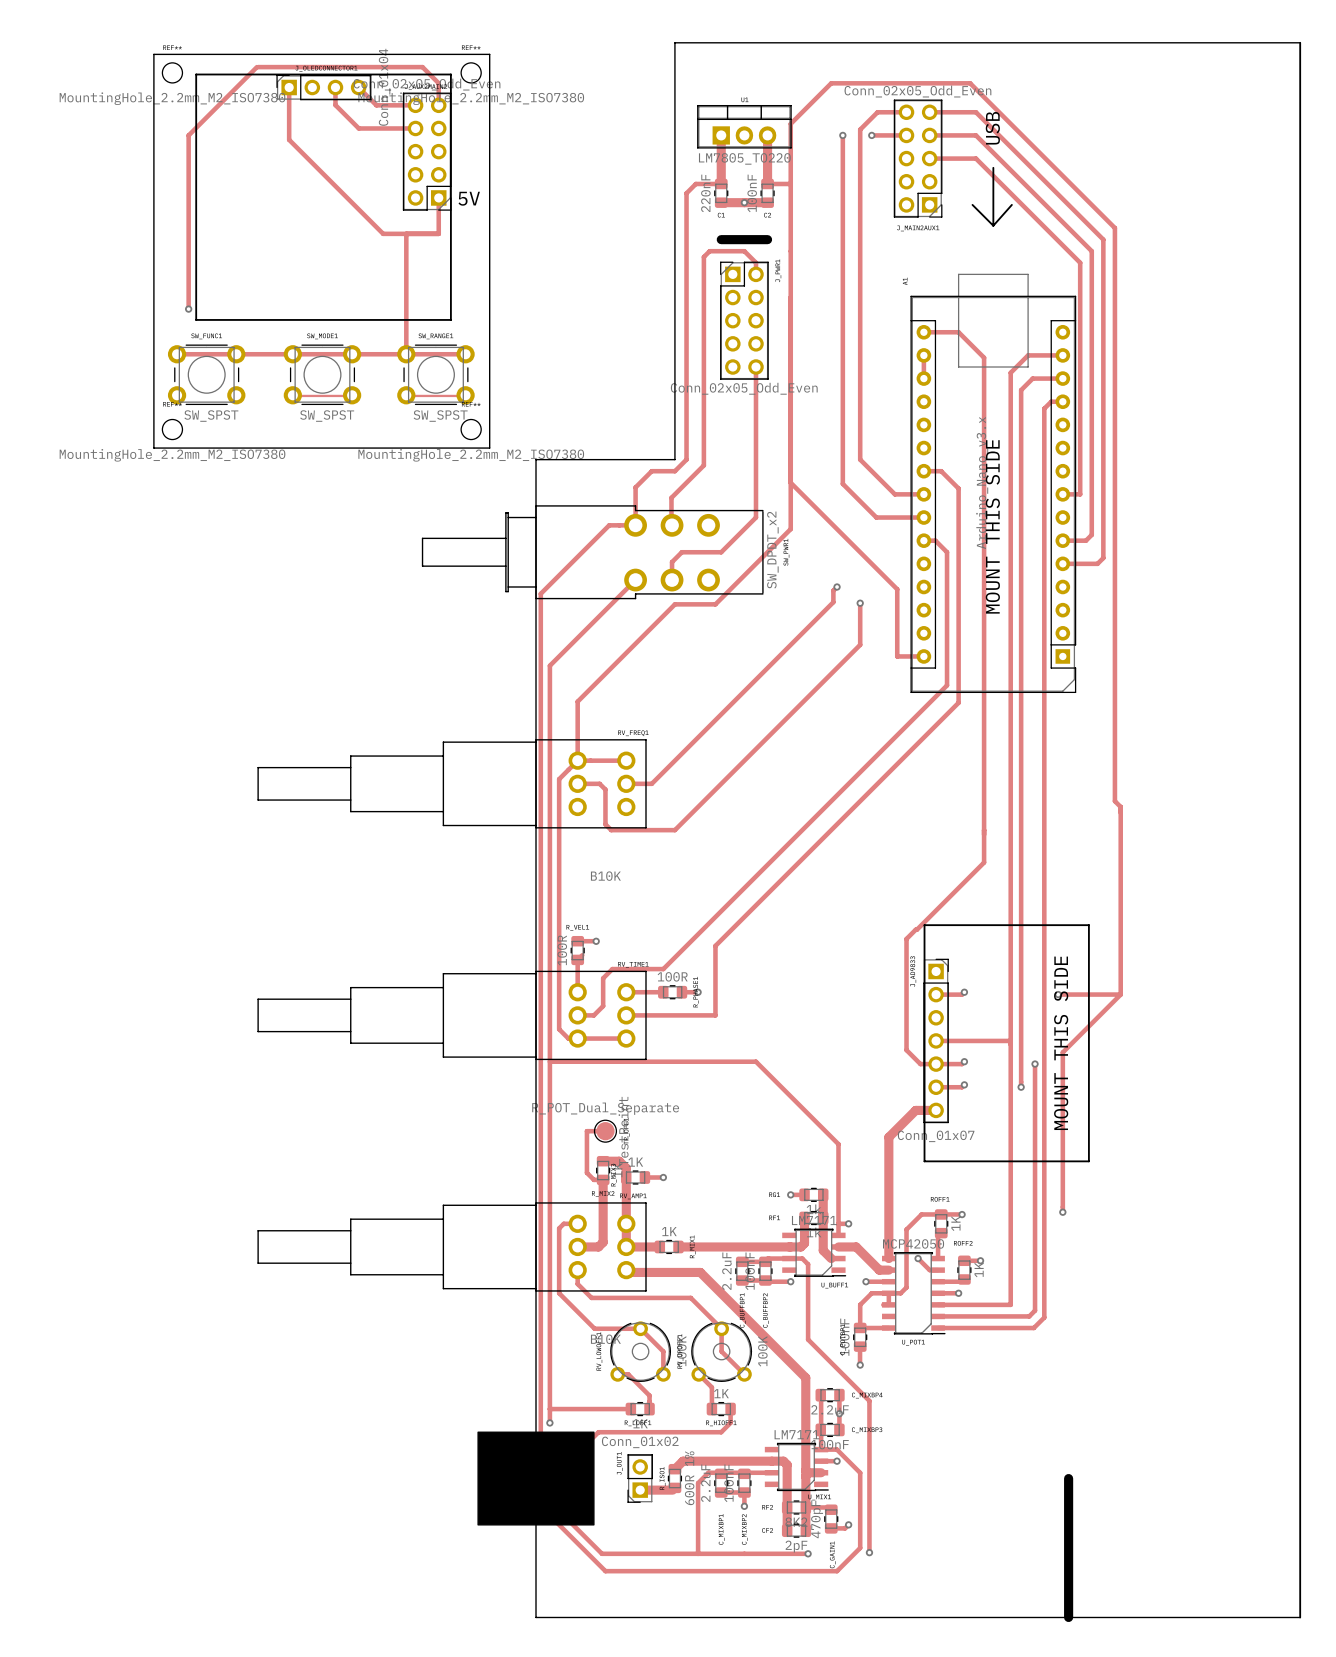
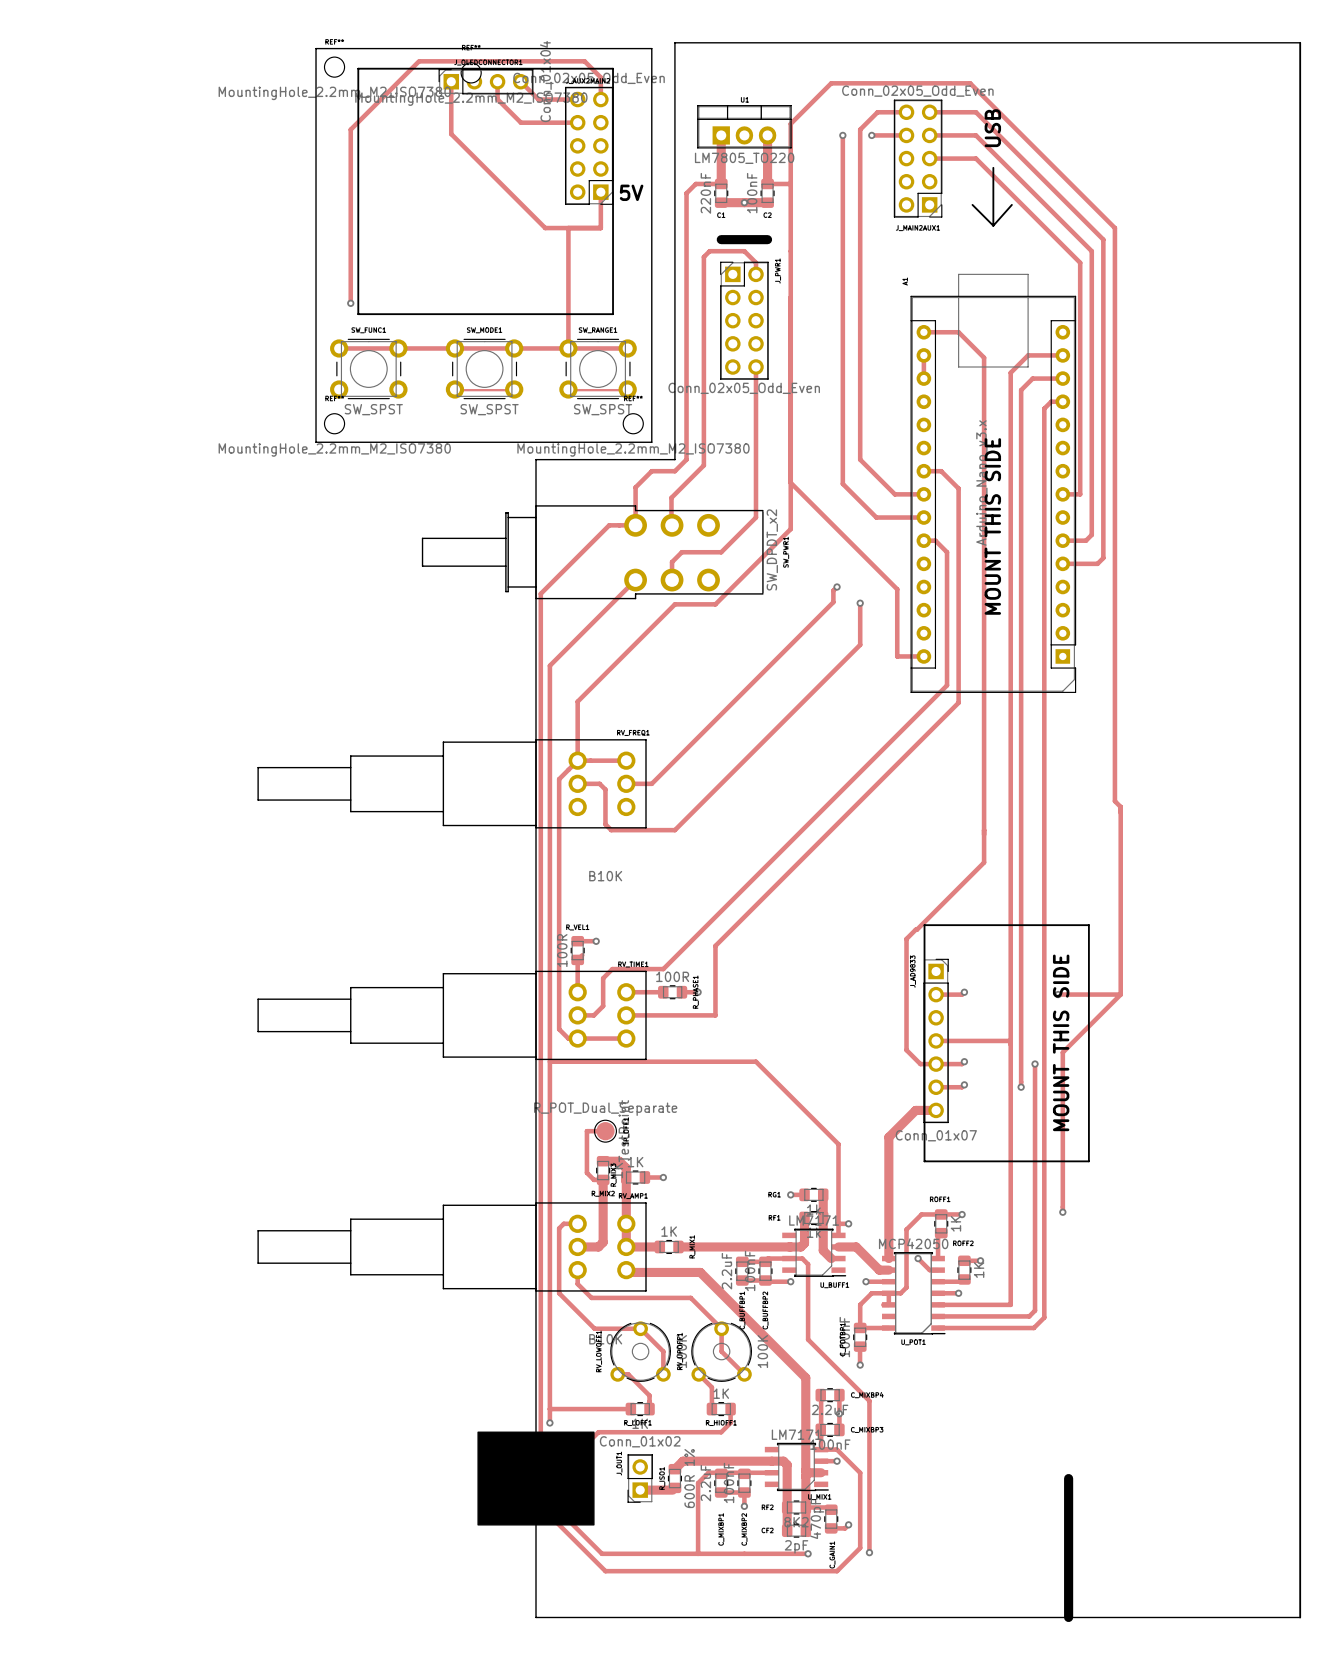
board edge: (153, 54) (153, 448) (489, 448) (489, 54) (153, 54) -> (316, 48) (316, 442) (651, 442) (651, 48) (316, 48)
part position: (172, 72) -> (334, 67)
line: (196, 74) (196, 319) (450, 319) (450, 74) (196, 74) -> (358, 68) (358, 314) (613, 314) (613, 68) (358, 68)
track: (289, 87) (289, 139) (383, 233) (438, 233) (438, 197) -> (451, 81) (451, 134) (545, 228) (600, 228) (600, 192)
part position: (323, 87) -> (486, 81)
track: (335, 87) (335, 105) (358, 128) (415, 128) -> (497, 81) (497, 99) (520, 122) (577, 122)
track: (358, 87) (376, 105) (415, 105) -> (520, 81) (538, 99) (577, 99)
track: (438, 105) (438, 83) (422, 67) (256, 67) (188, 135) (188, 309) -> (600, 99) (600, 77) (584, 61) (419, 61) (350, 129) (350, 303)
part position: (427, 151) -> (589, 145)
text position: 5V (469, 198) -> 5V (631, 192)
track: (406, 233) (406, 354) -> (568, 228) (568, 348)
via: none -> (350, 303)
via: (188, 309) -> none
track: (179, 354) (465, 354) -> (341, 348) (627, 348)
part position: (206, 374) -> (368, 368)
part position: (322, 374) -> (484, 368)
part position: (435, 374) -> (598, 368)
track: (348, 395) (299, 395) (294, 401) -> (510, 390) (461, 390) (456, 395)
track: (406, 395) (471, 395) -> (568, 390) (633, 390)
part: none -> MountingHole_2.2mm_M2_ISO7380 (334, 423)
part: none -> MountingHole_2.2mm_M2_ISO7380 (633, 423)
part: MountingHole_2.2mm_M2_ISO7380 (172, 429) -> none
part: MountingHole_2.2mm_M2_ISO7380 (471, 429) -> none

